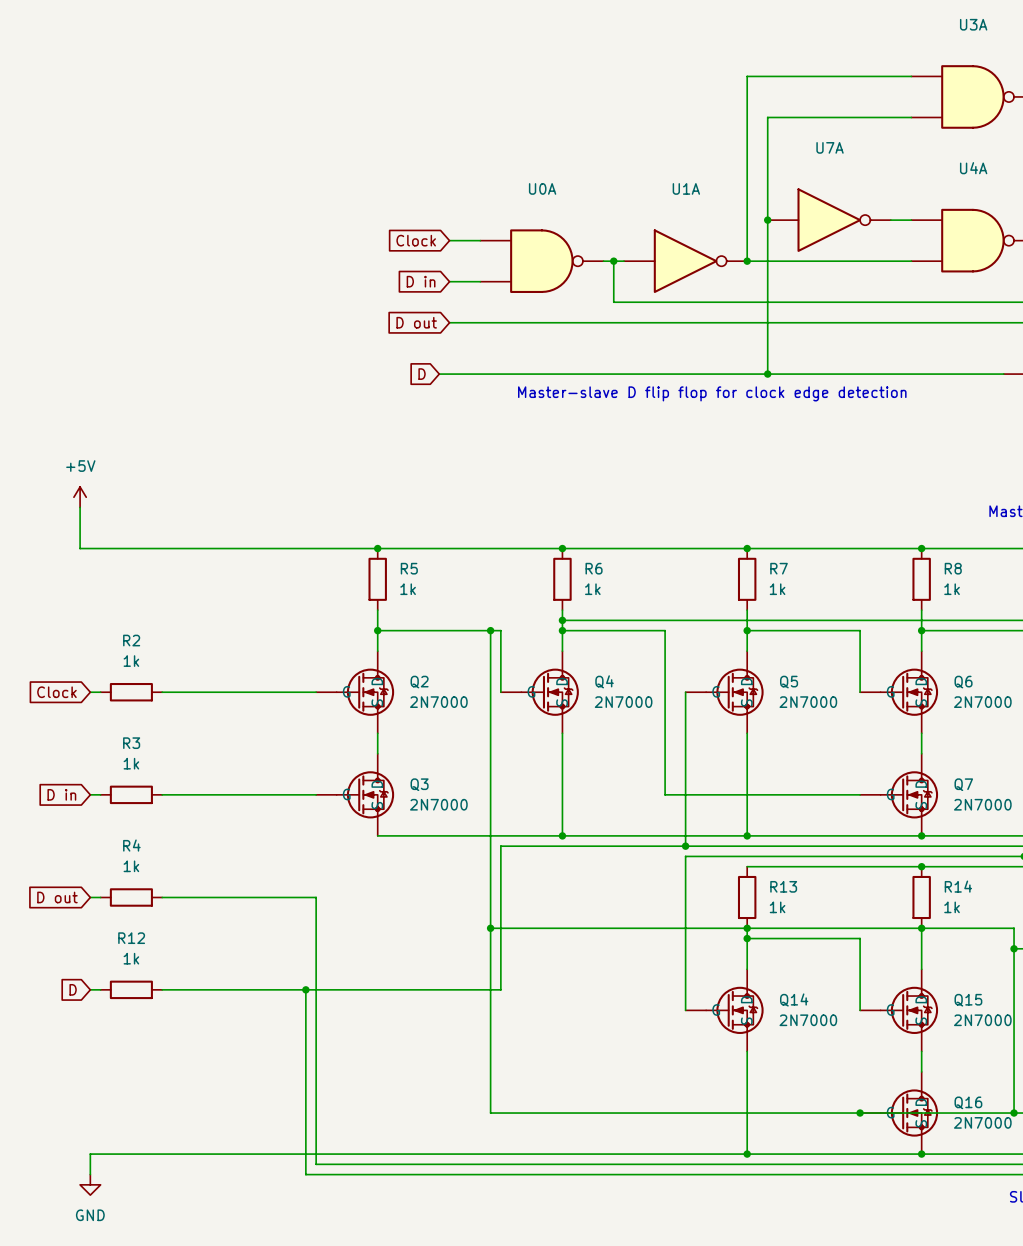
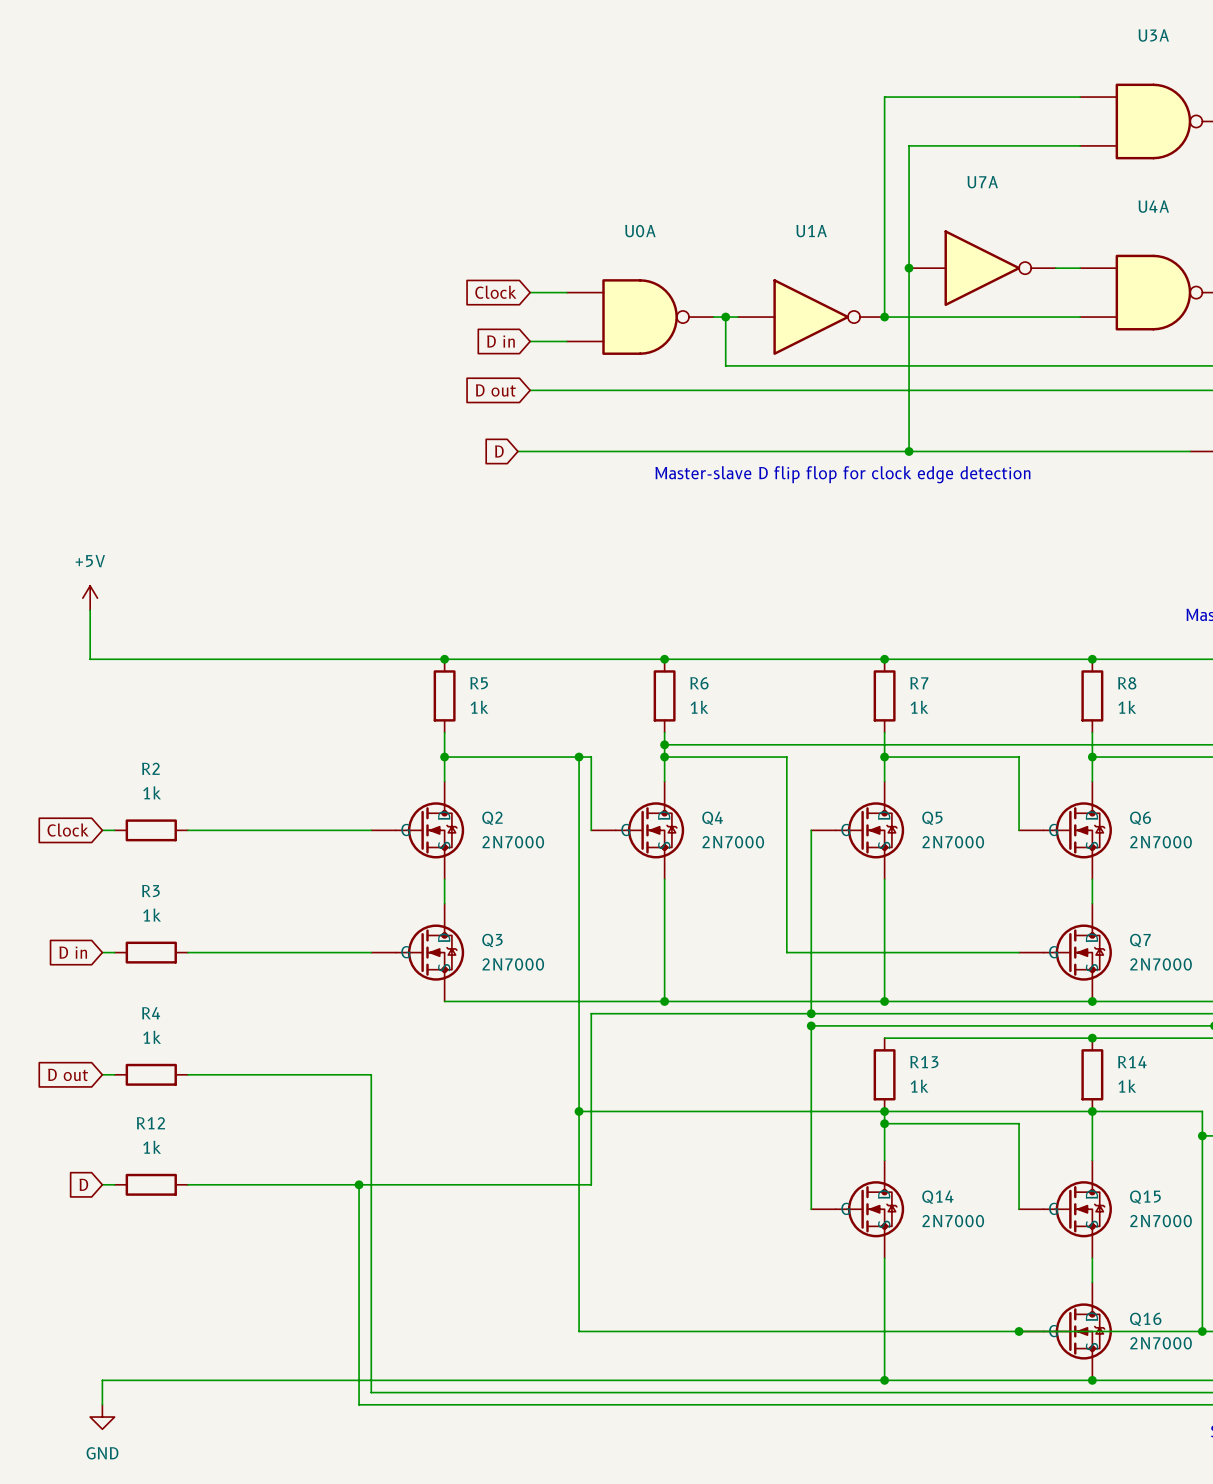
junction: none -> (811, 1025)

